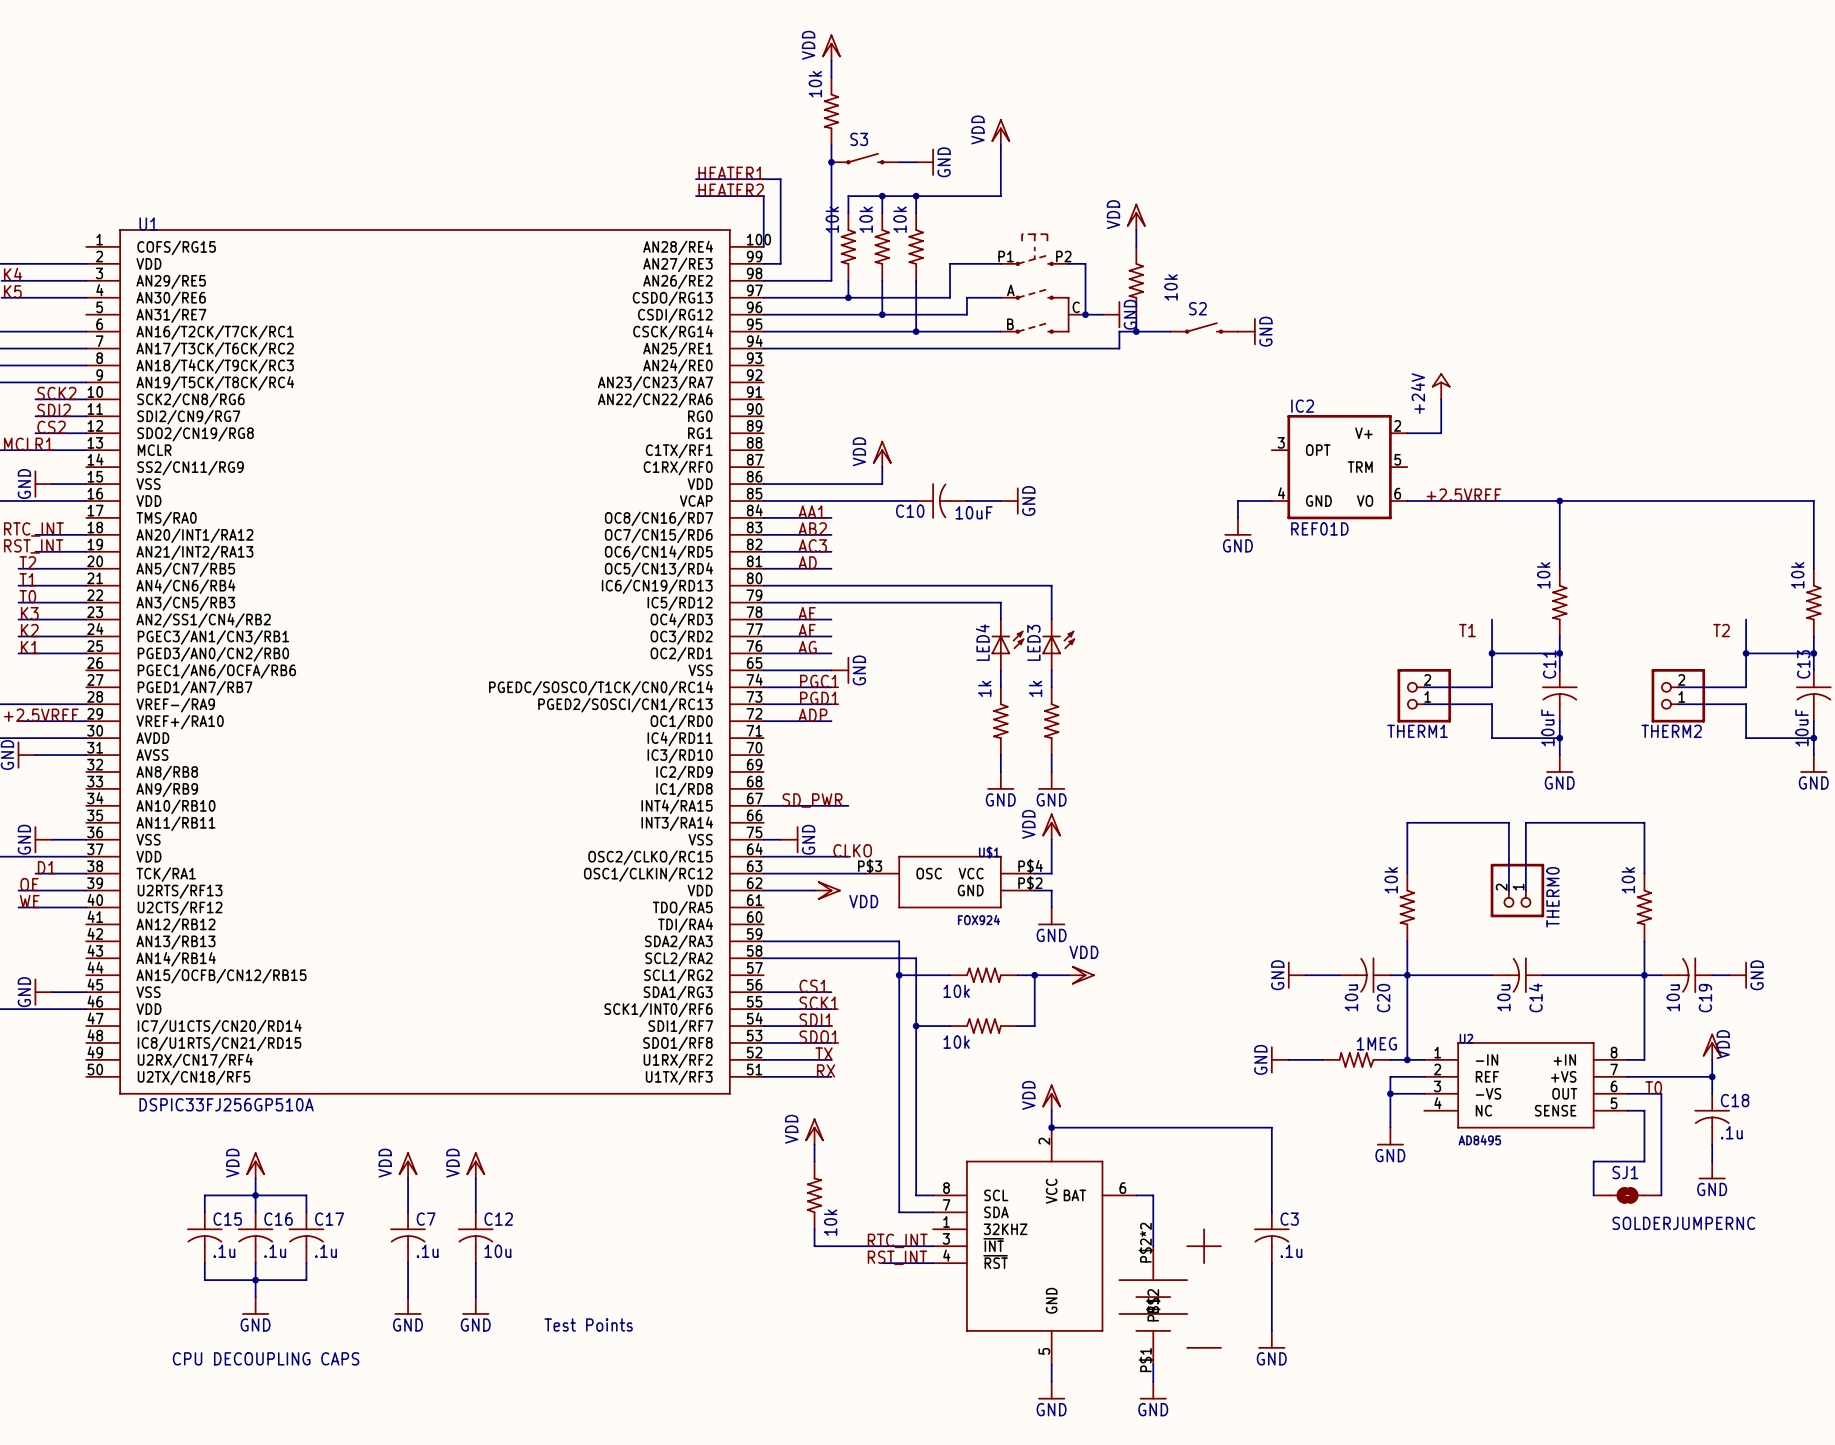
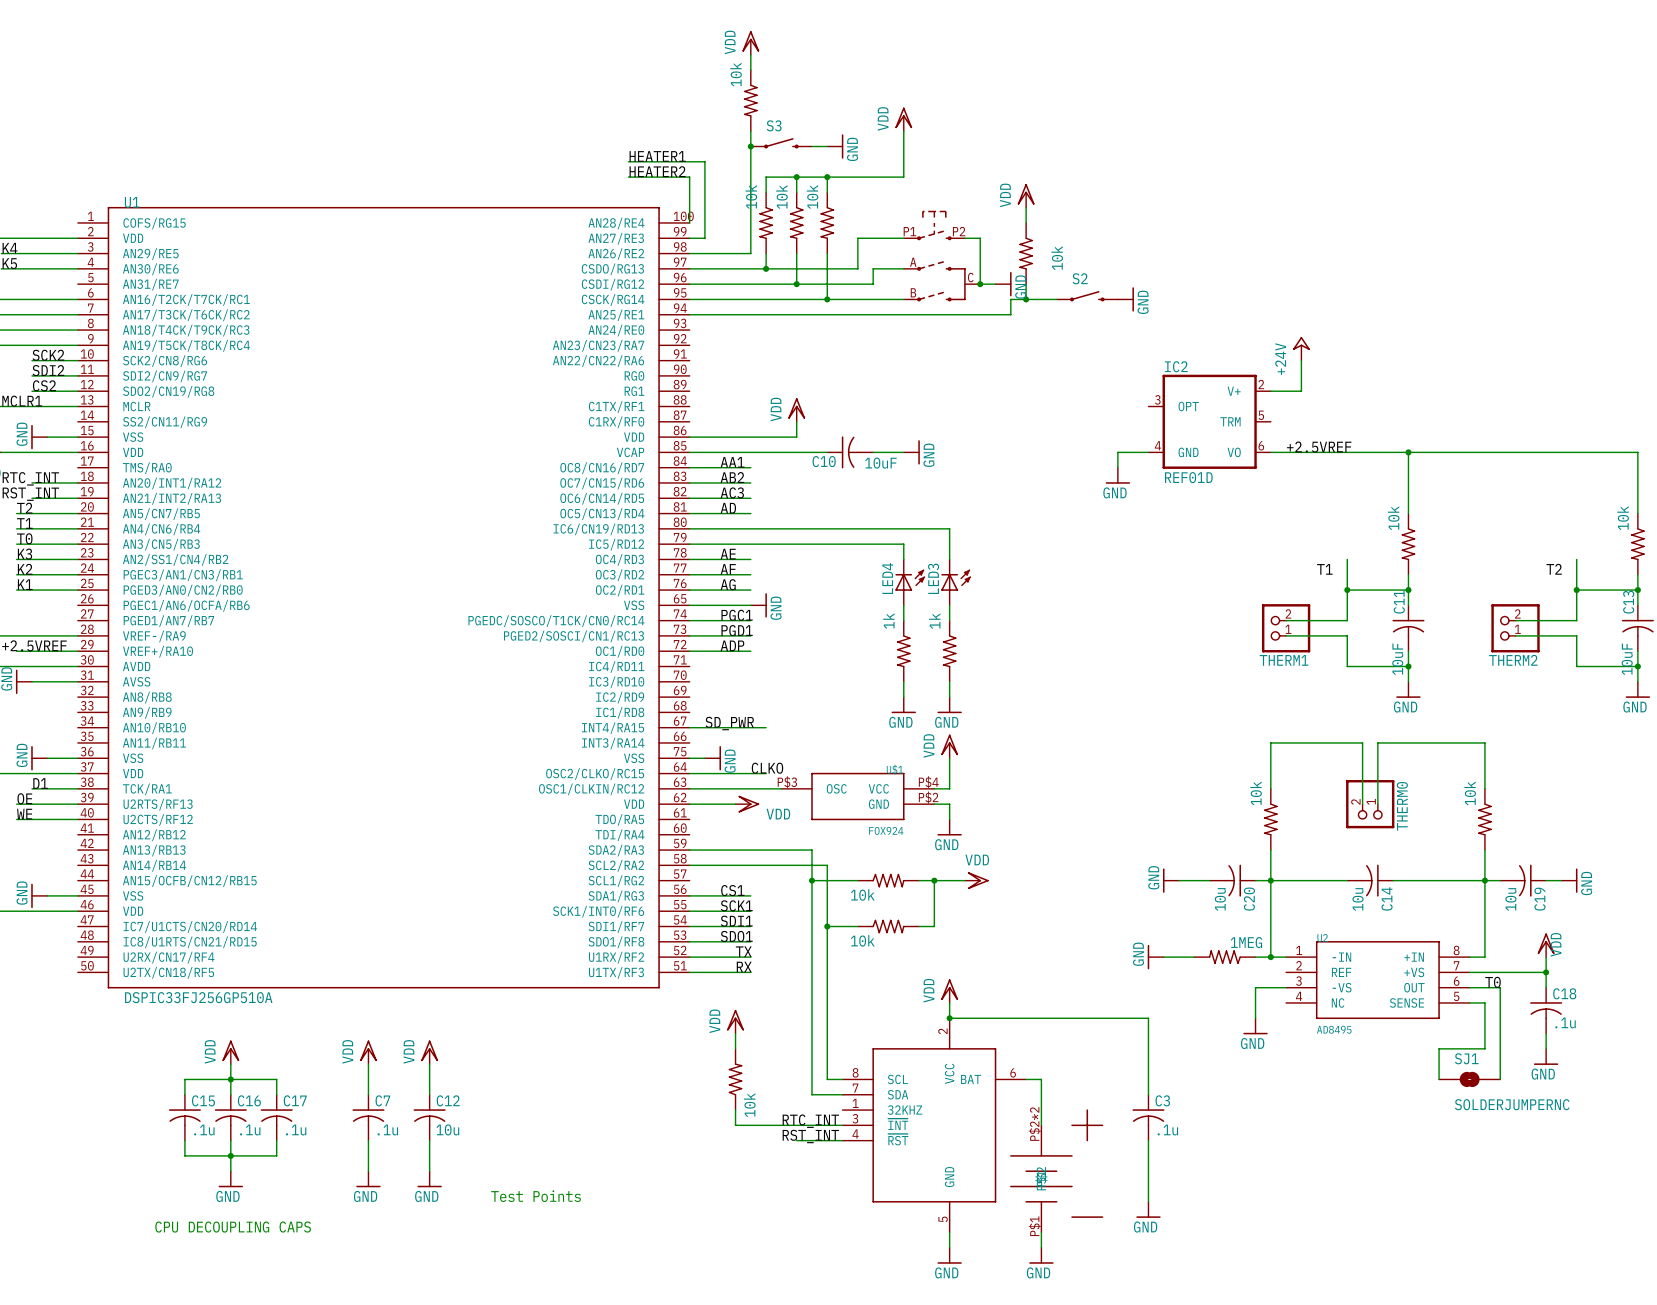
wire: (1424, 1076) (1390, 1076) (1390, 1093) -> none
junction: (1390, 1093) -> none

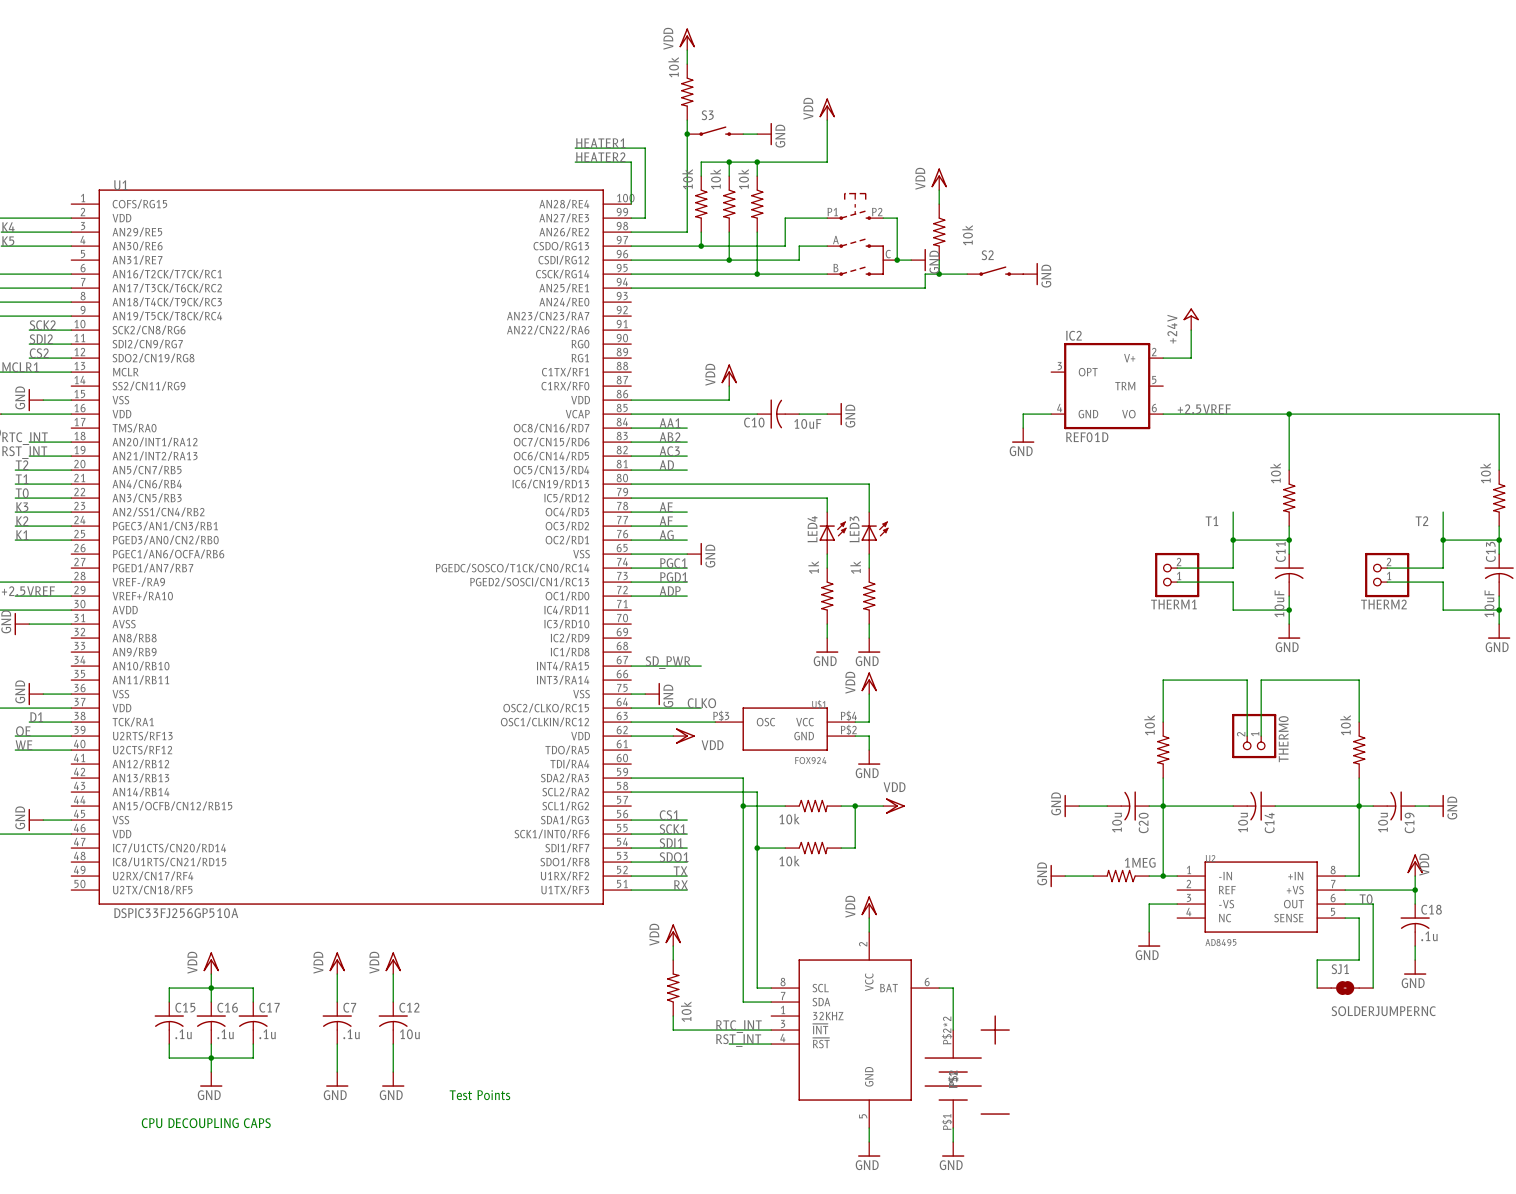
wire: (949, 1018) (1148, 1018) (1148, 1094) -> none
junction: (949, 1018) -> none
C3: .1u (1148, 1117) -> none
wire: (1148, 1140) (1148, 1201) -> none
power symbol: GND (1148, 1209) -> none

